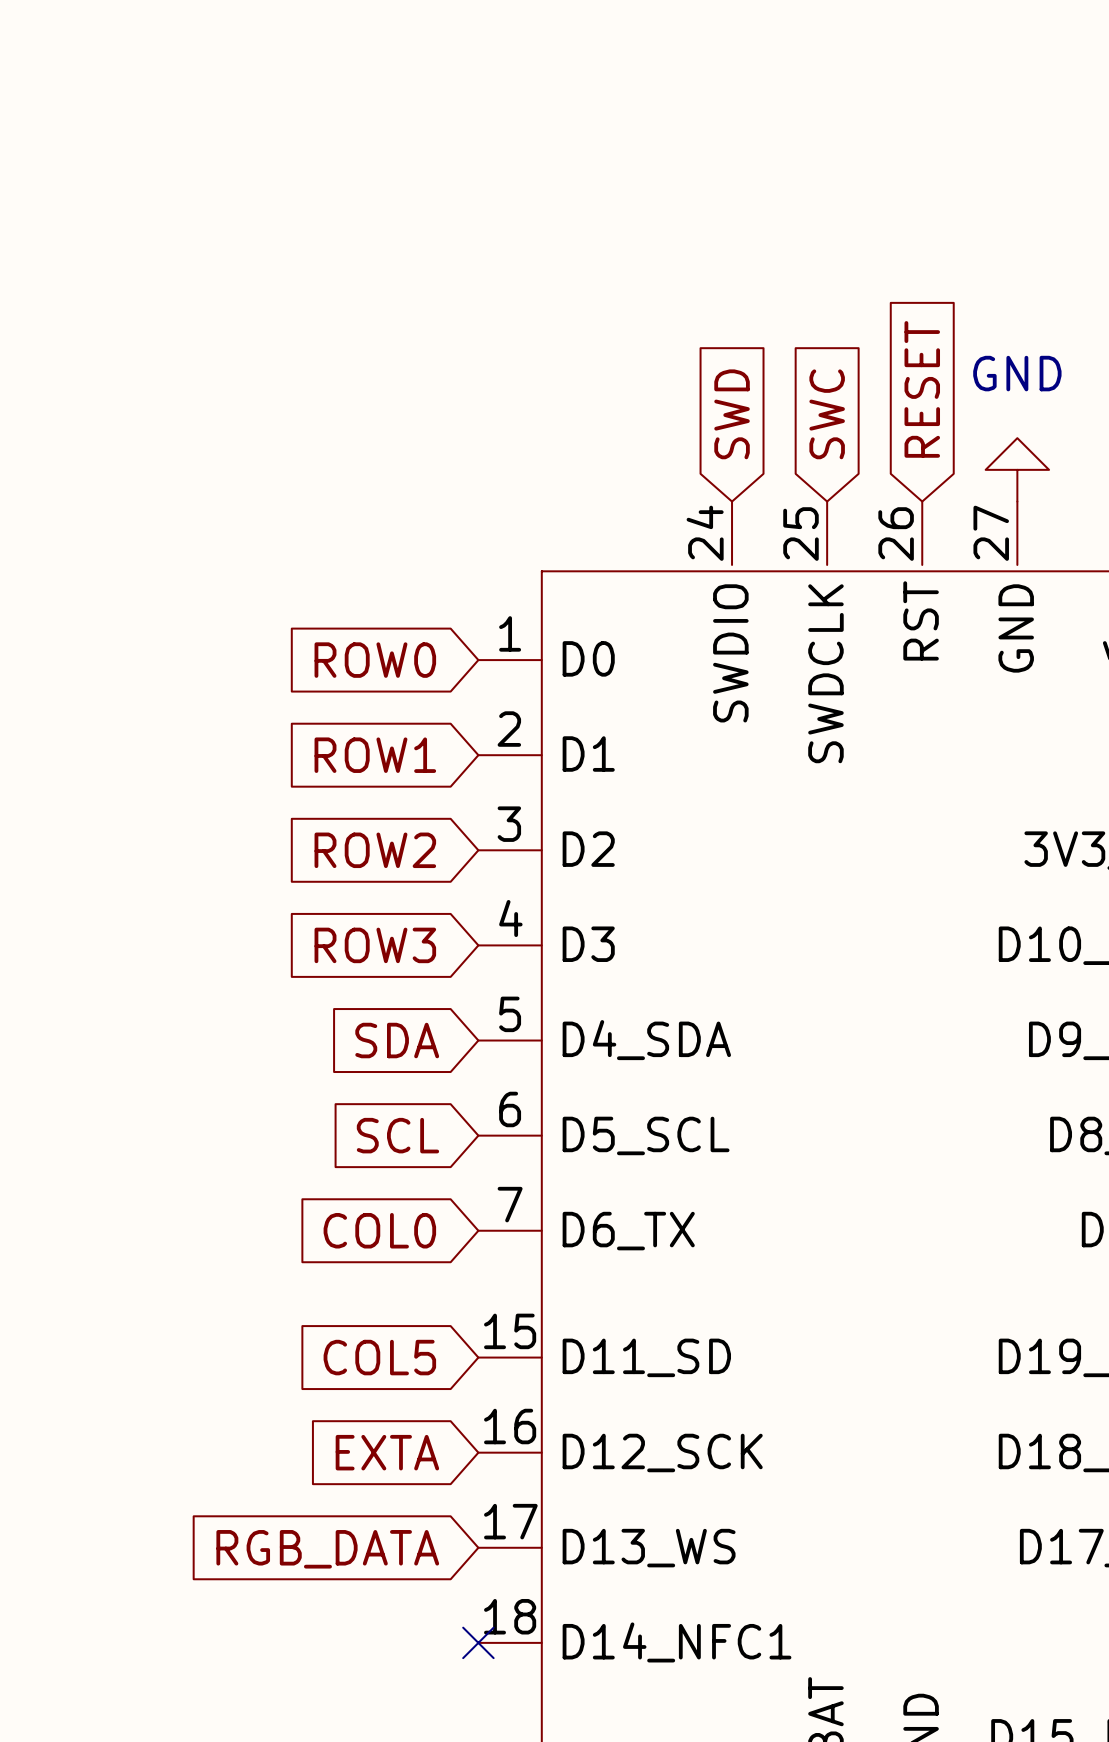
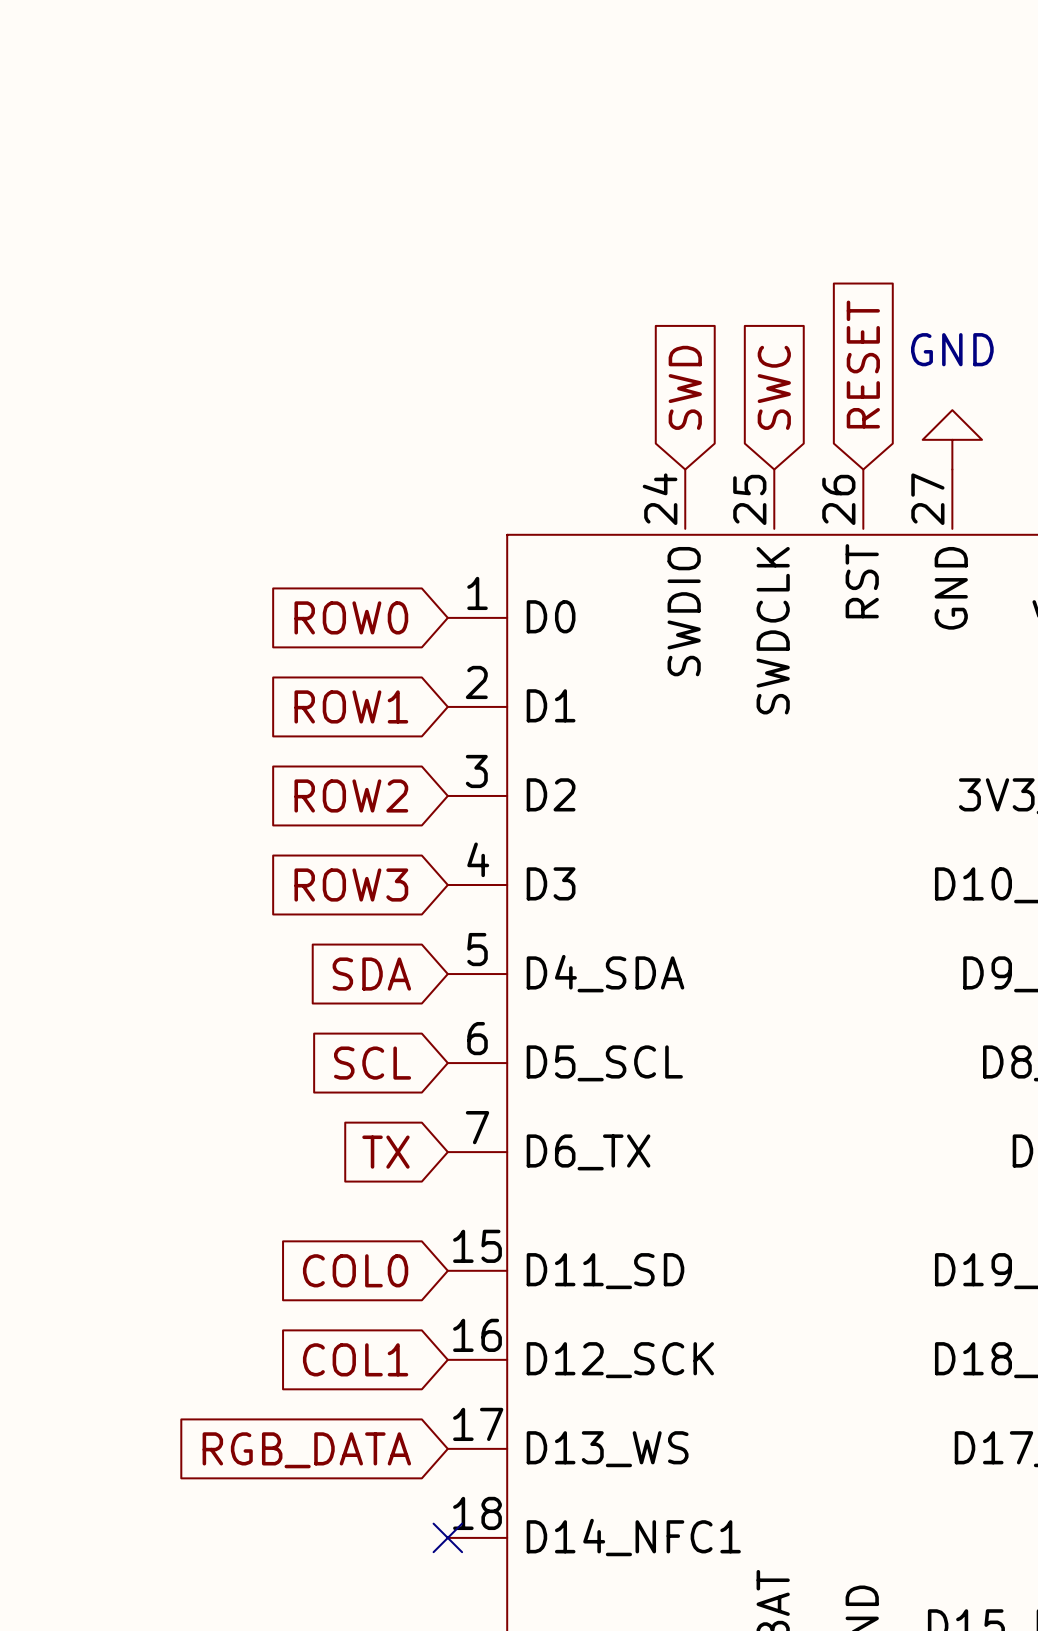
global label: COL0 (379, 1230) -> TX (385, 1152)
global label: COL5 (379, 1357) -> COL0 (355, 1270)
global label: EXTA (387, 1452) -> COL1 (355, 1359)

